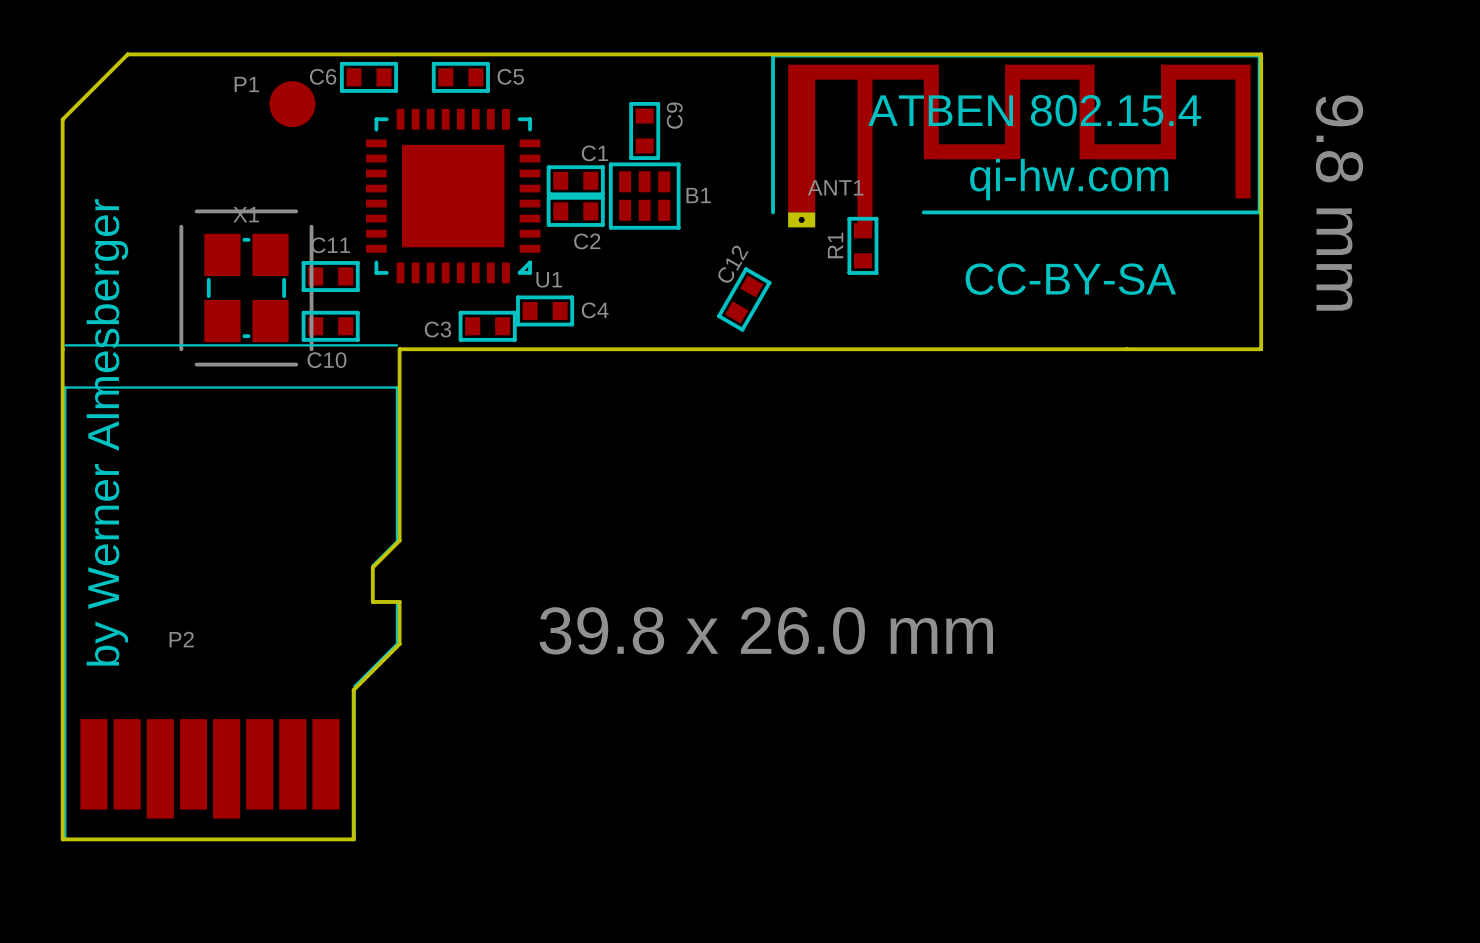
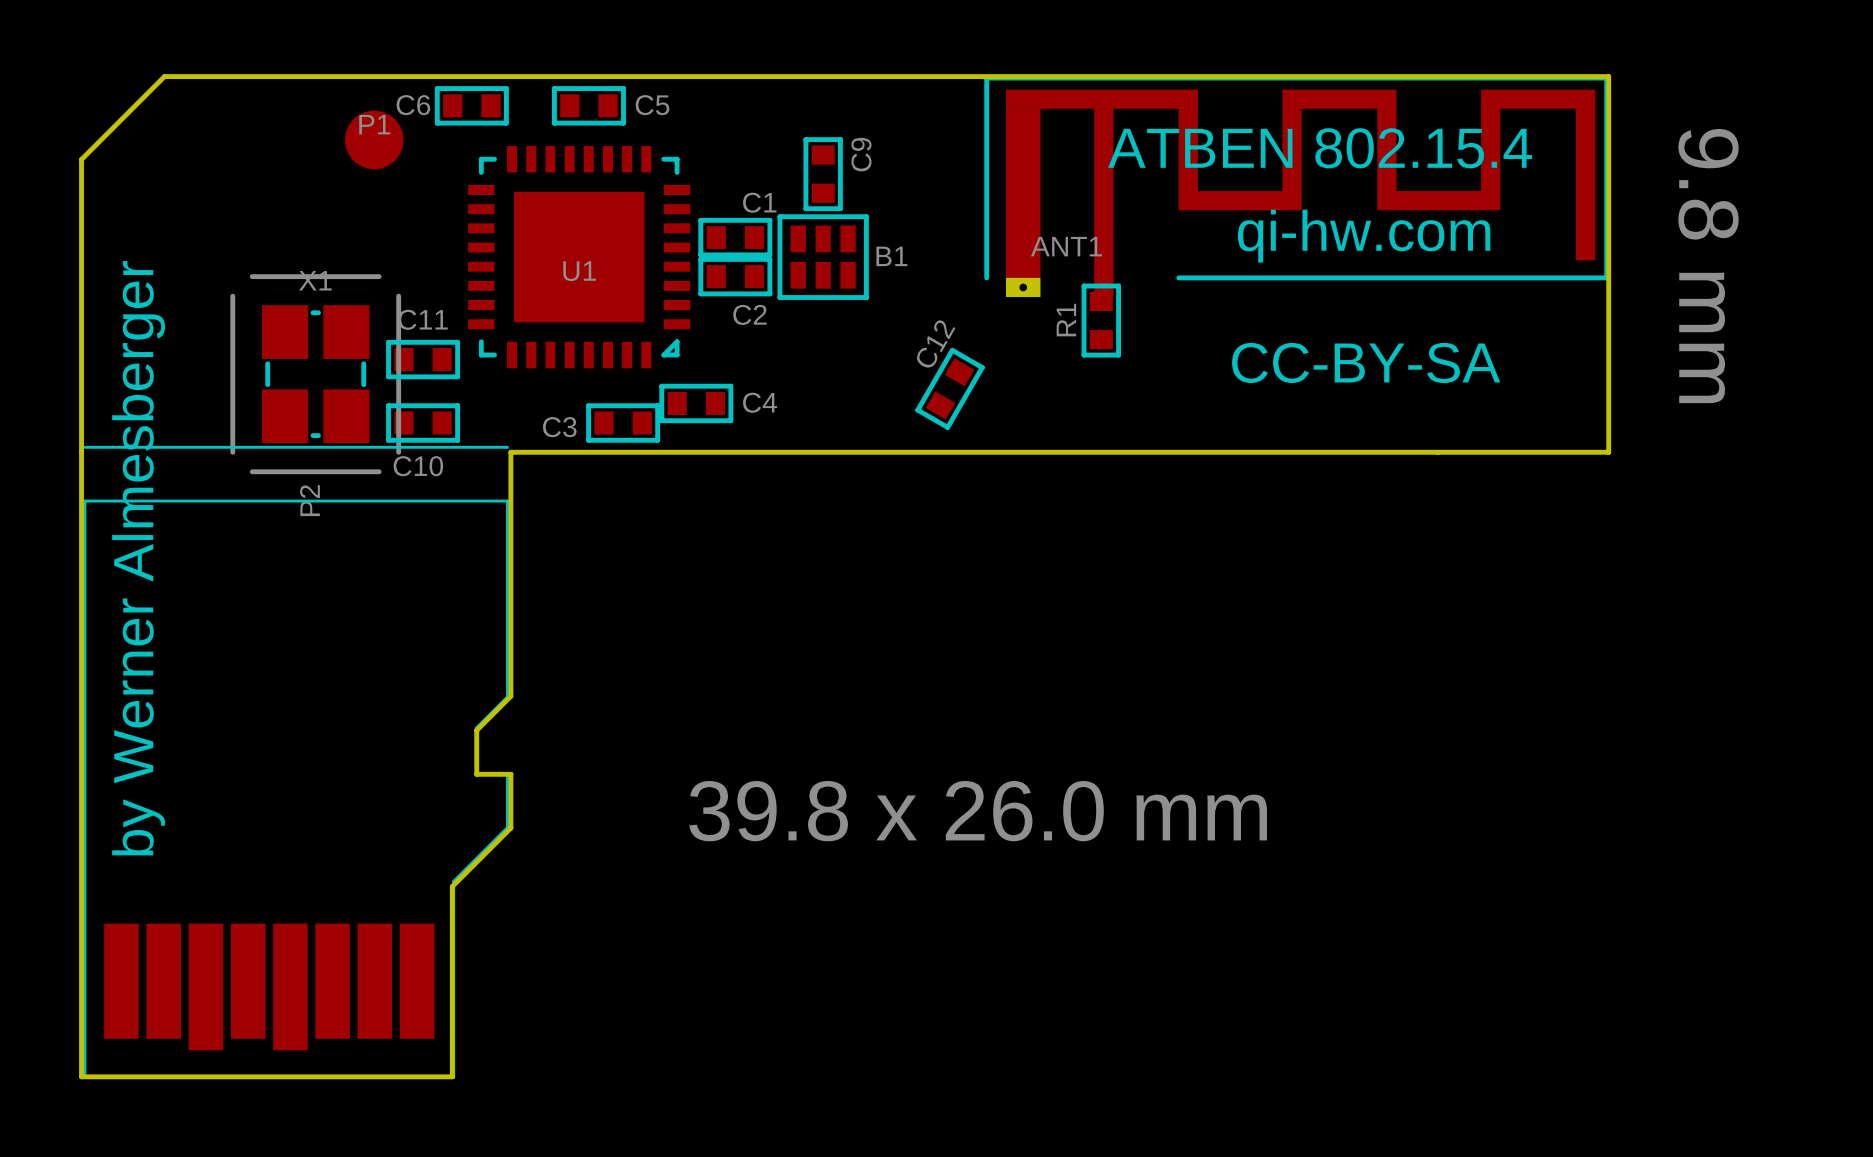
P1 name position: P1 (246, 84) -> P1 (374, 124)
U1 name position: U1 (549, 279) -> U1 (579, 271)
P2 name rotation: 0° (181, 639) -> 90° counterclockwise (309, 500)
P2 name position: P2 (181, 639) -> P2 (309, 500)

